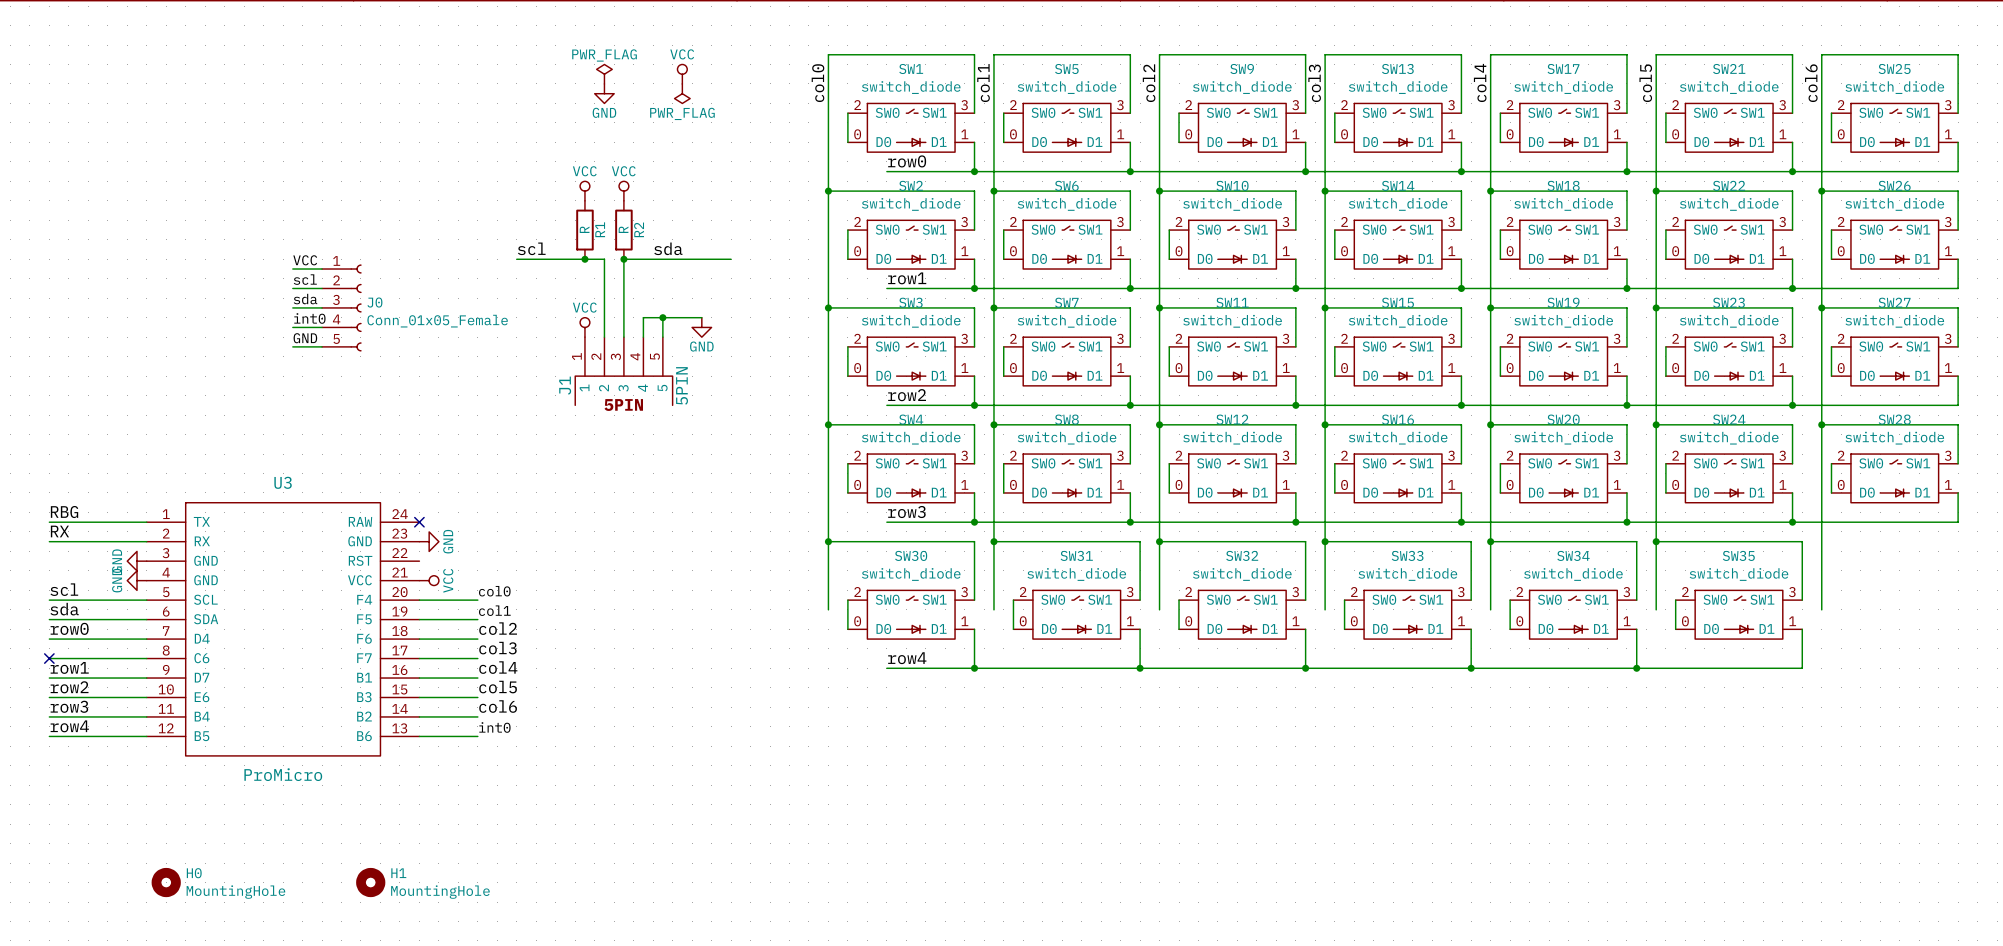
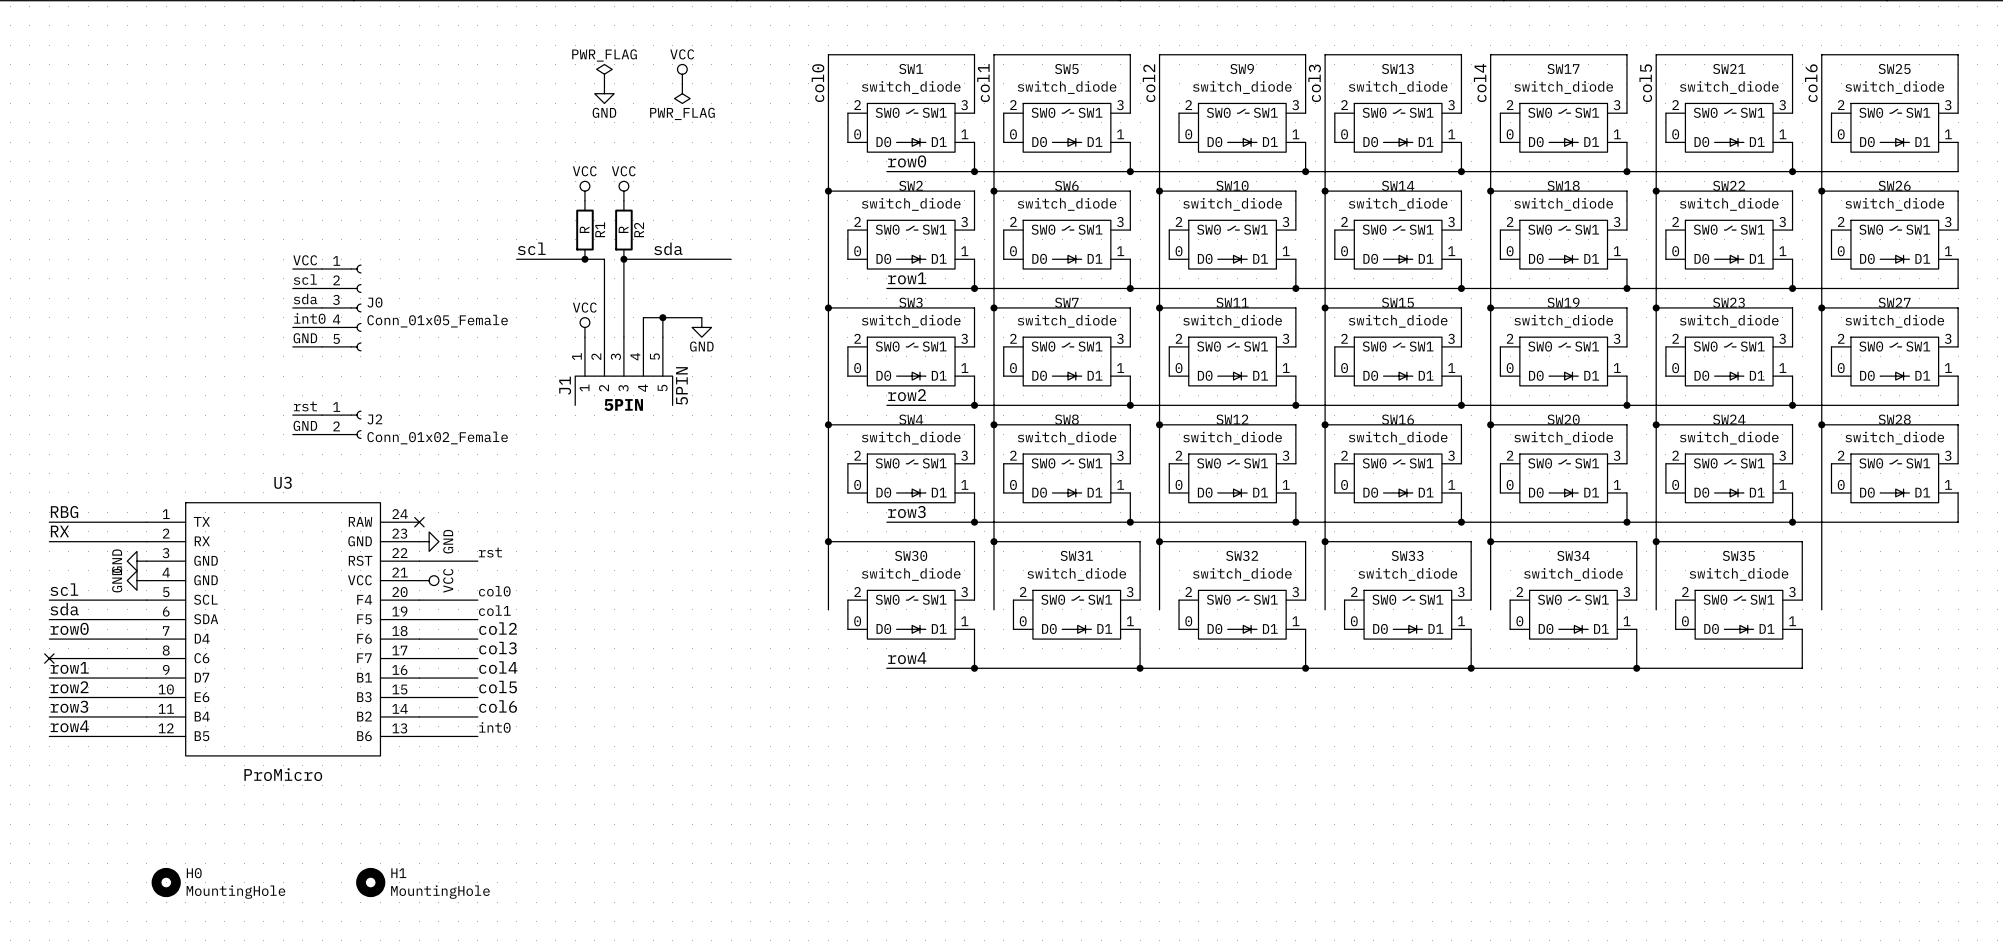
label: none -> rst (305, 406)
wire: none -> (292, 415) (322, 415)
J2: none -> Conn_01x02_Female (341, 424)
label: none -> GND (305, 425)
wire: none -> (292, 434) (322, 434)
label: none -> rst (490, 552)
wire: none -> (419, 561) (477, 561)

